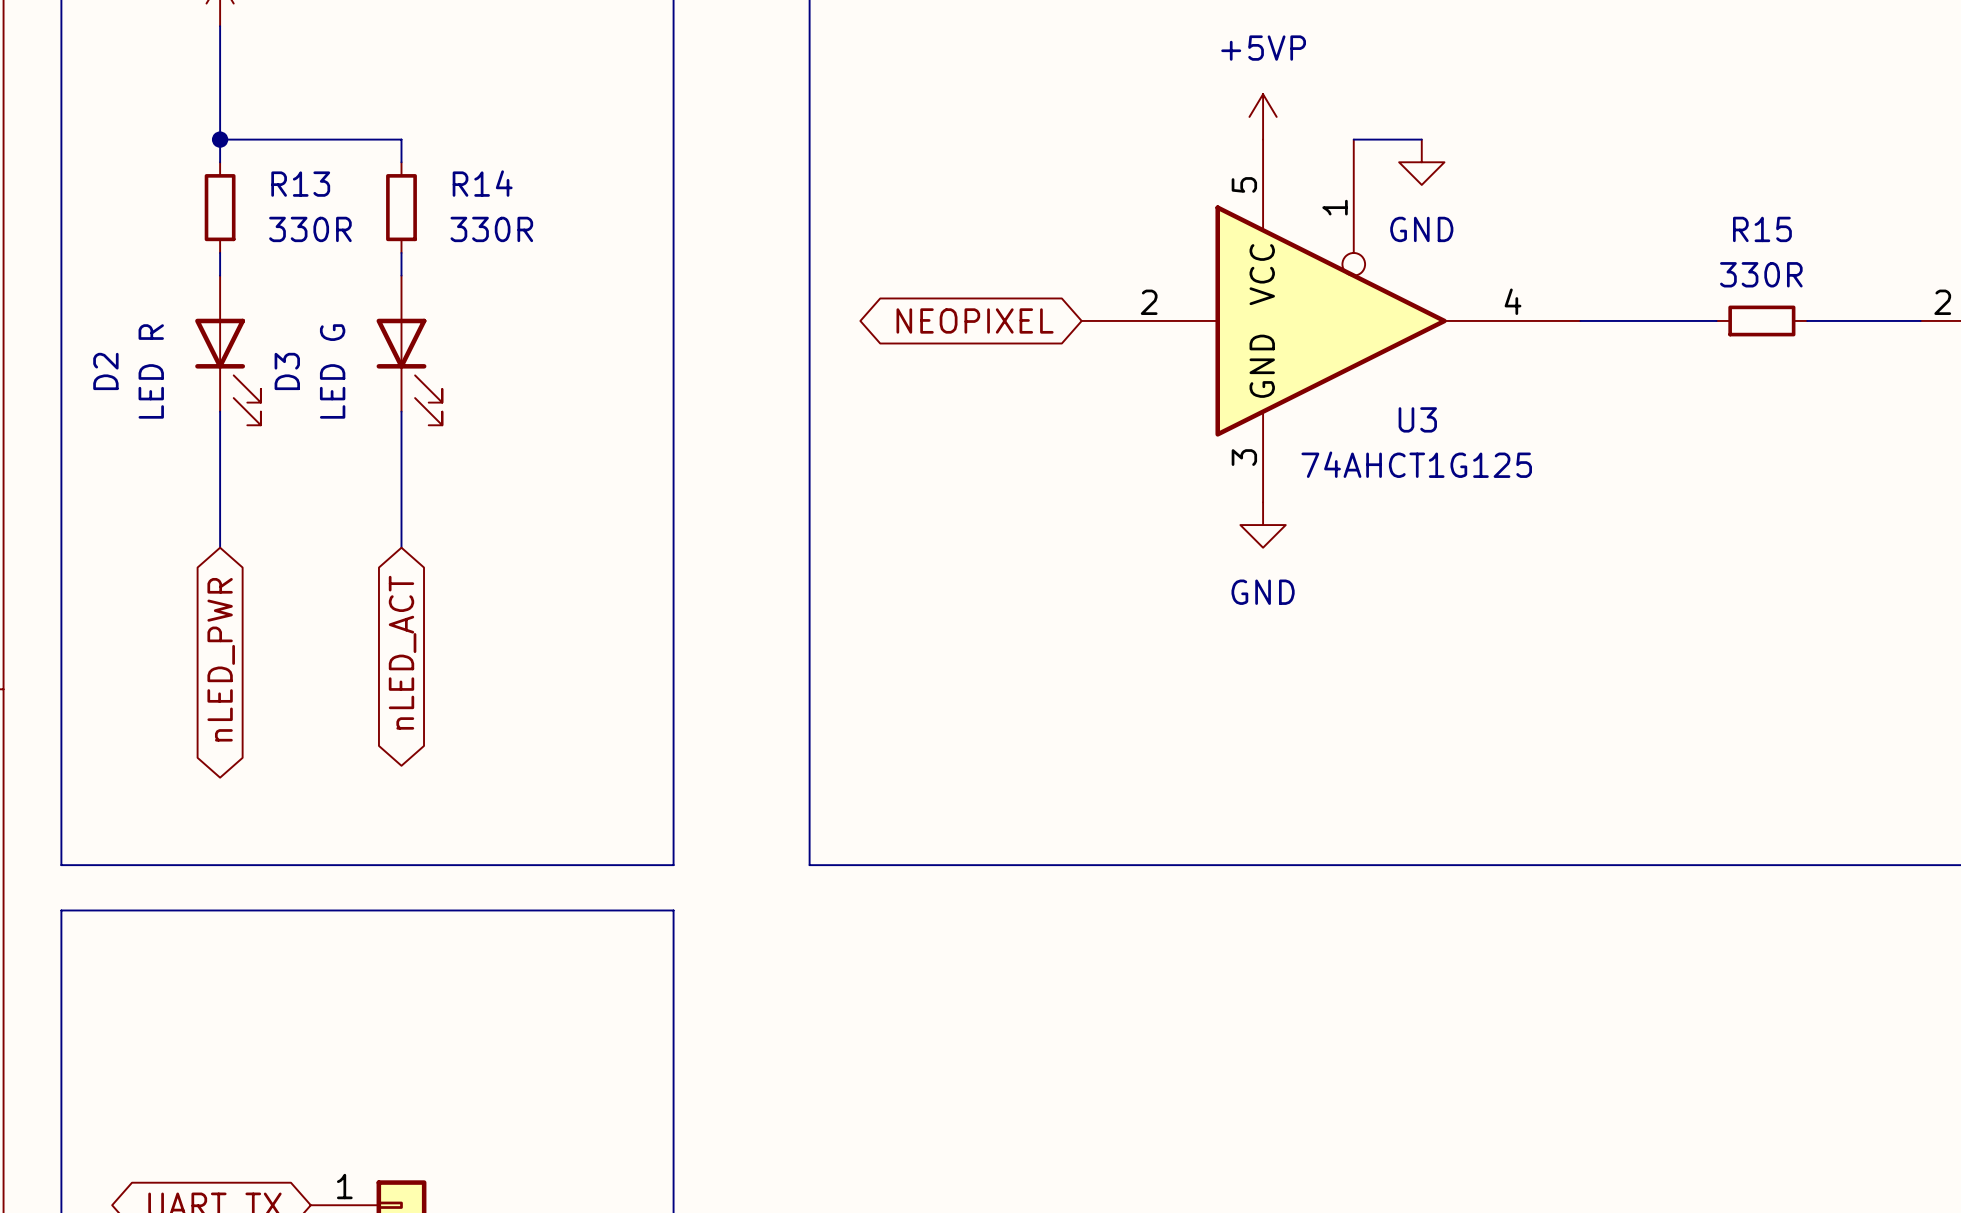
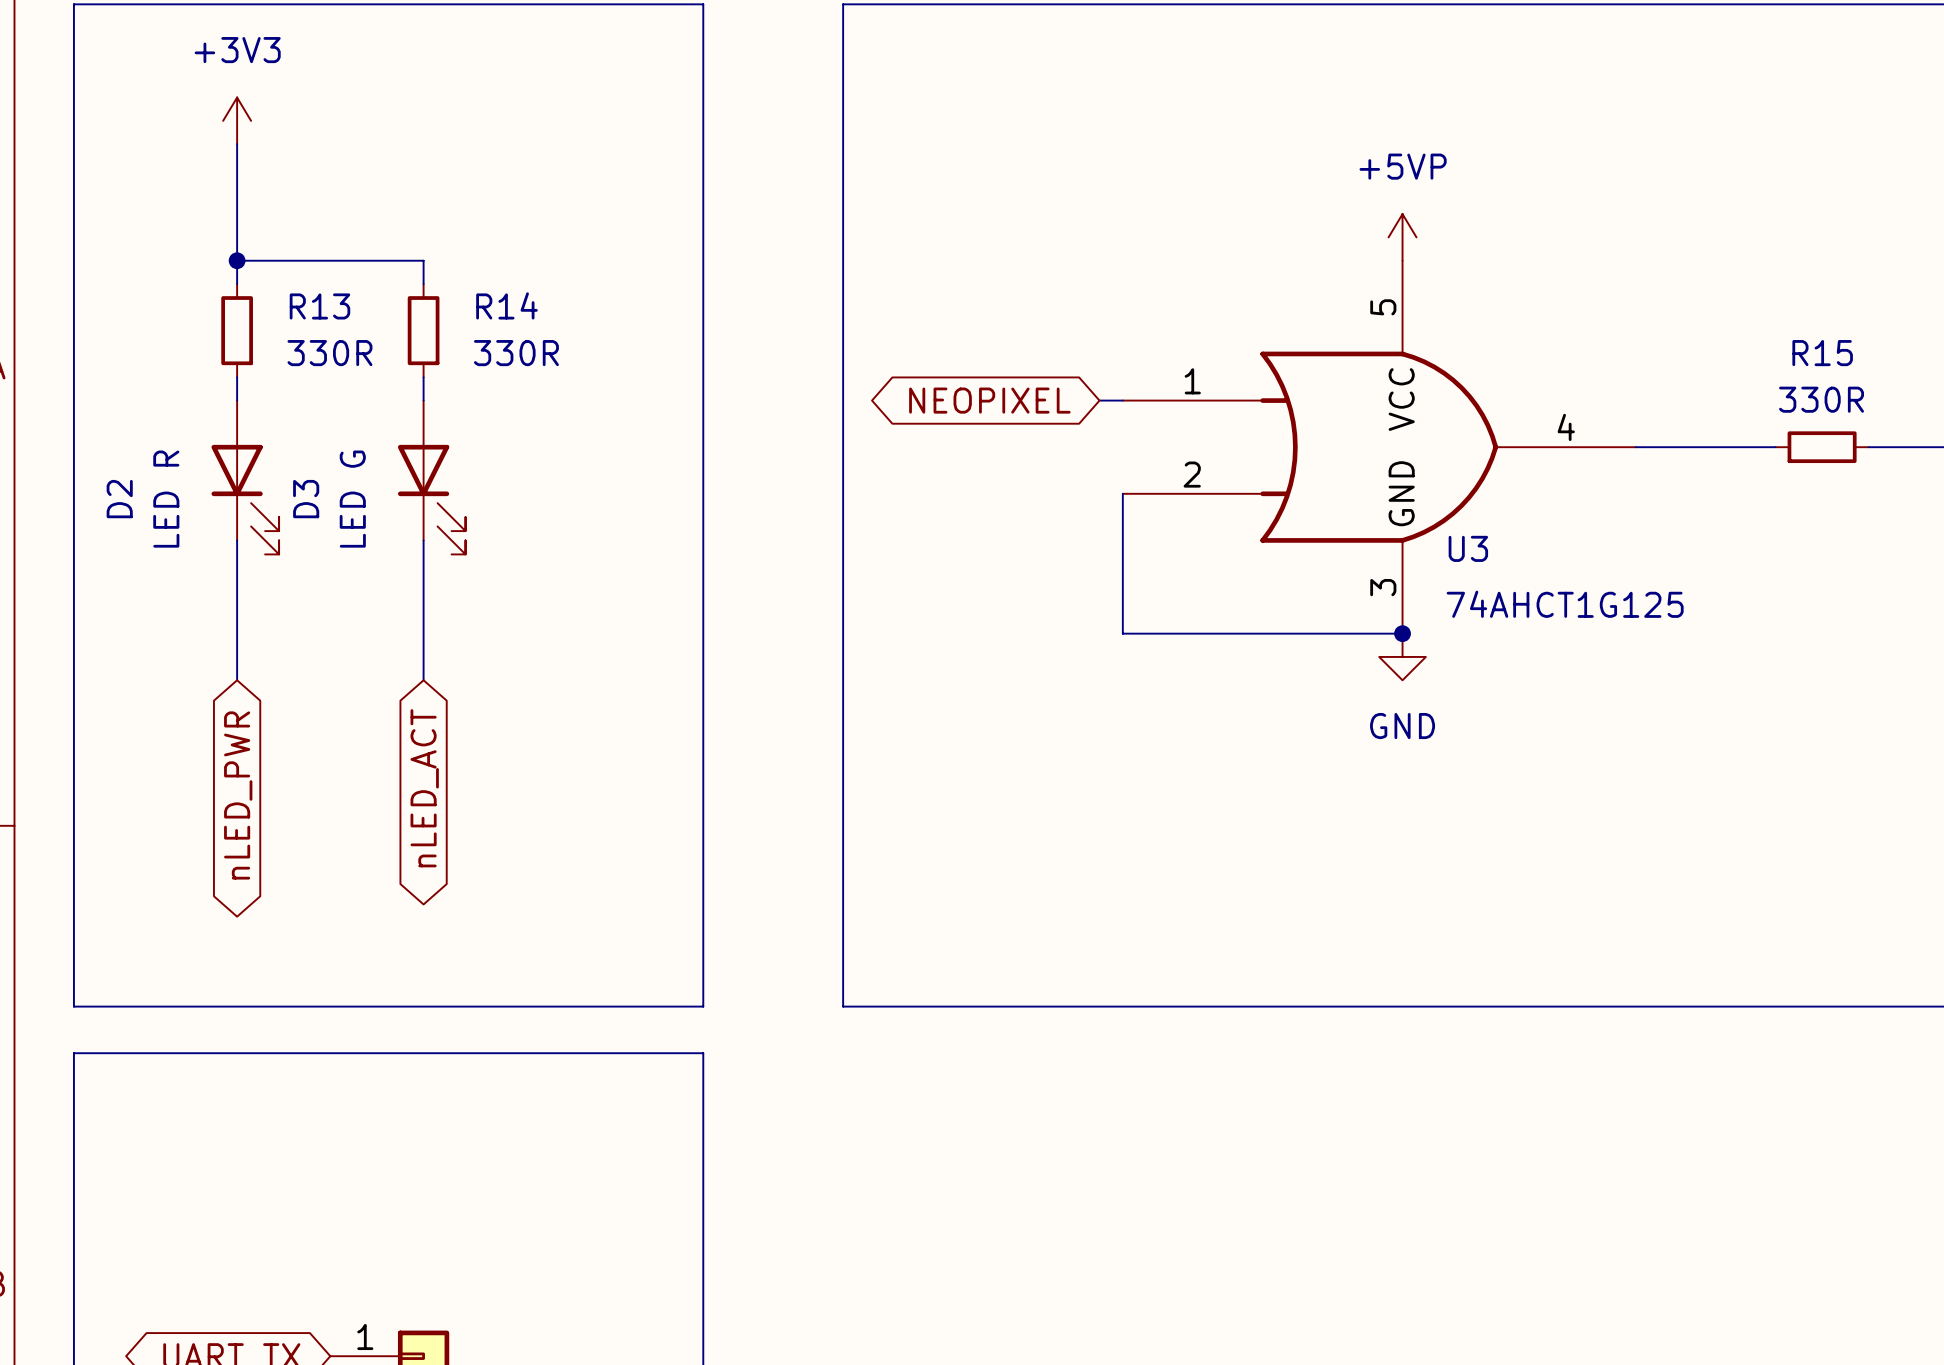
power symbol position: +5VP (1263, 116) -> +5VP (1402, 237)
U3 symbol: [1081, 139, 1581, 503] -> [1122, 260, 1636, 634]
wire: (1353, 139) (1421, 139) -> none
power symbol: GND (1421, 162) -> none
wire: none -> (1099, 400) (1122, 400)
global label position: NEOPIXEL (975, 320) -> NEOPIXEL (989, 400)
wire: none -> (1122, 493) (1122, 633) (1402, 633)
U3 value position: 74AHCT1G125 (1416, 464) -> 74AHCT1G125 (1565, 604)
junction: none -> (1402, 633)
power symbol position: GND (1263, 525) -> GND (1402, 656)

